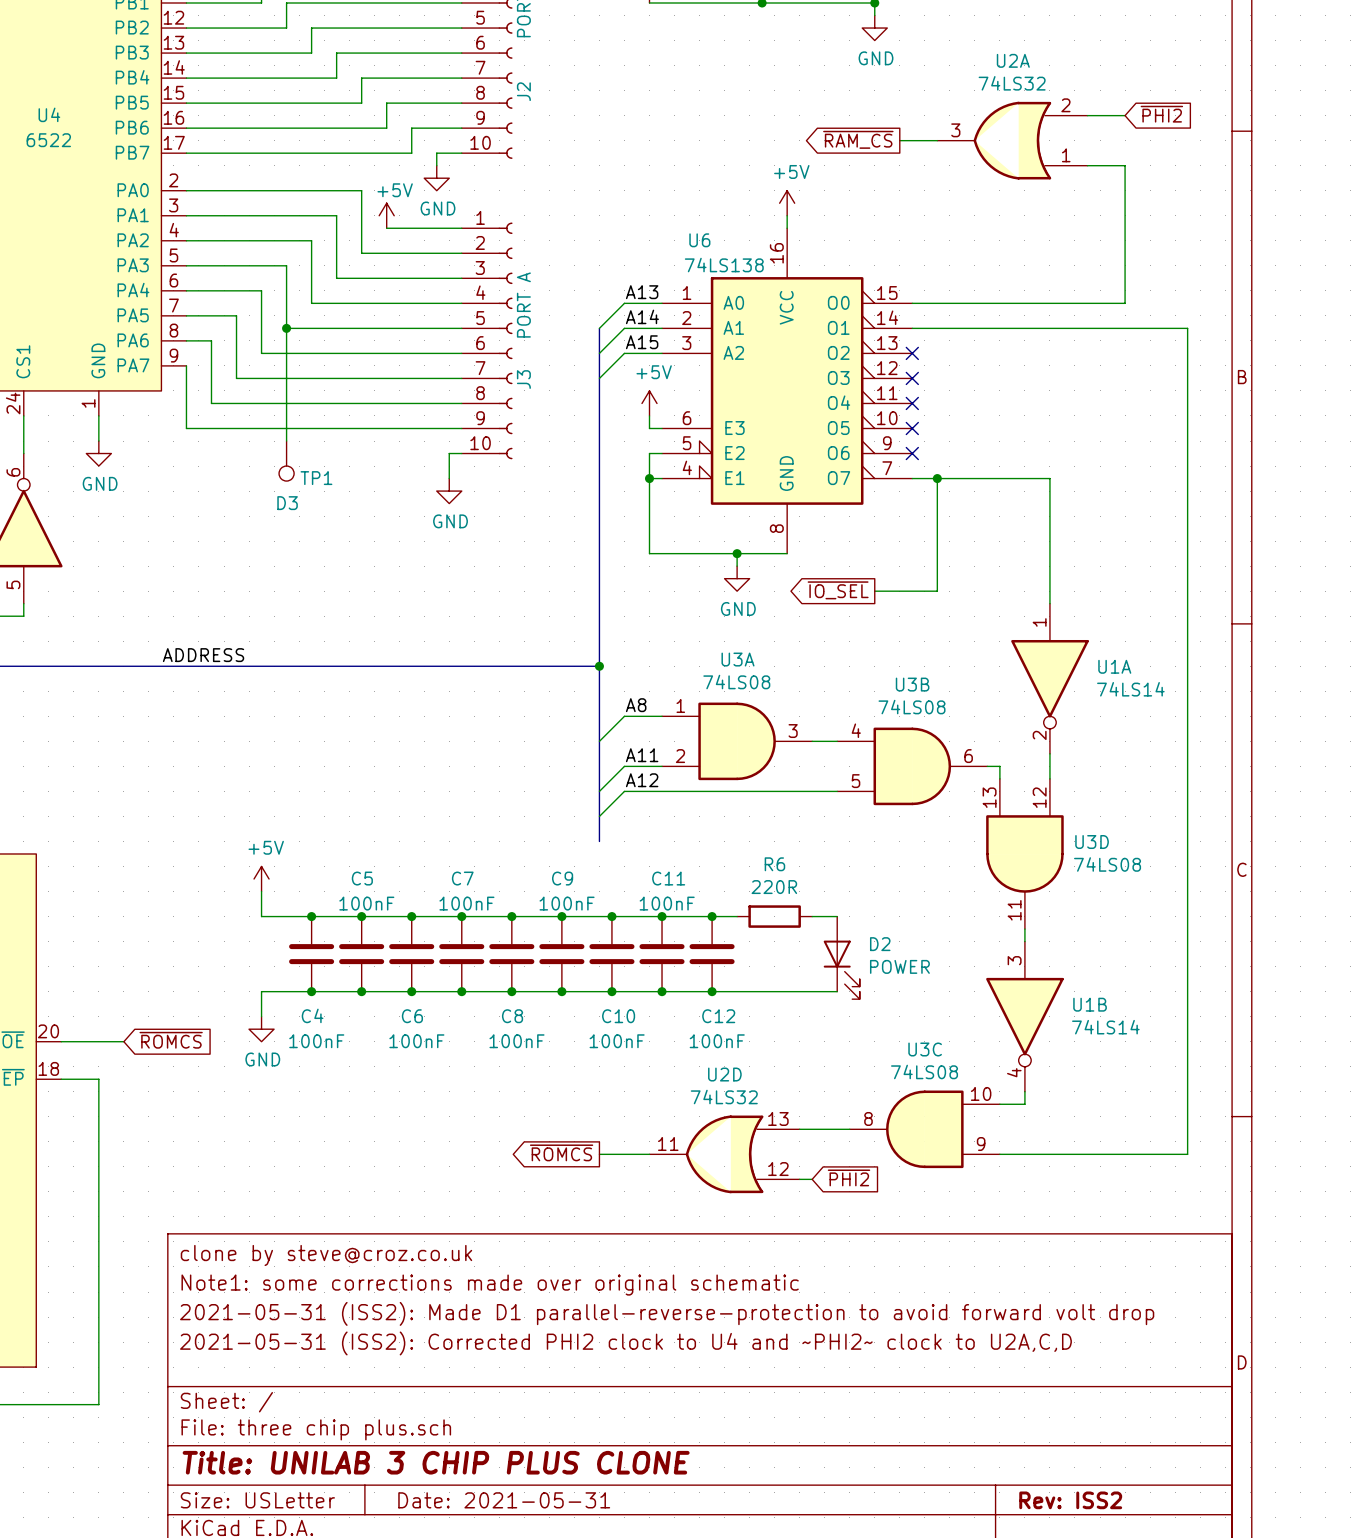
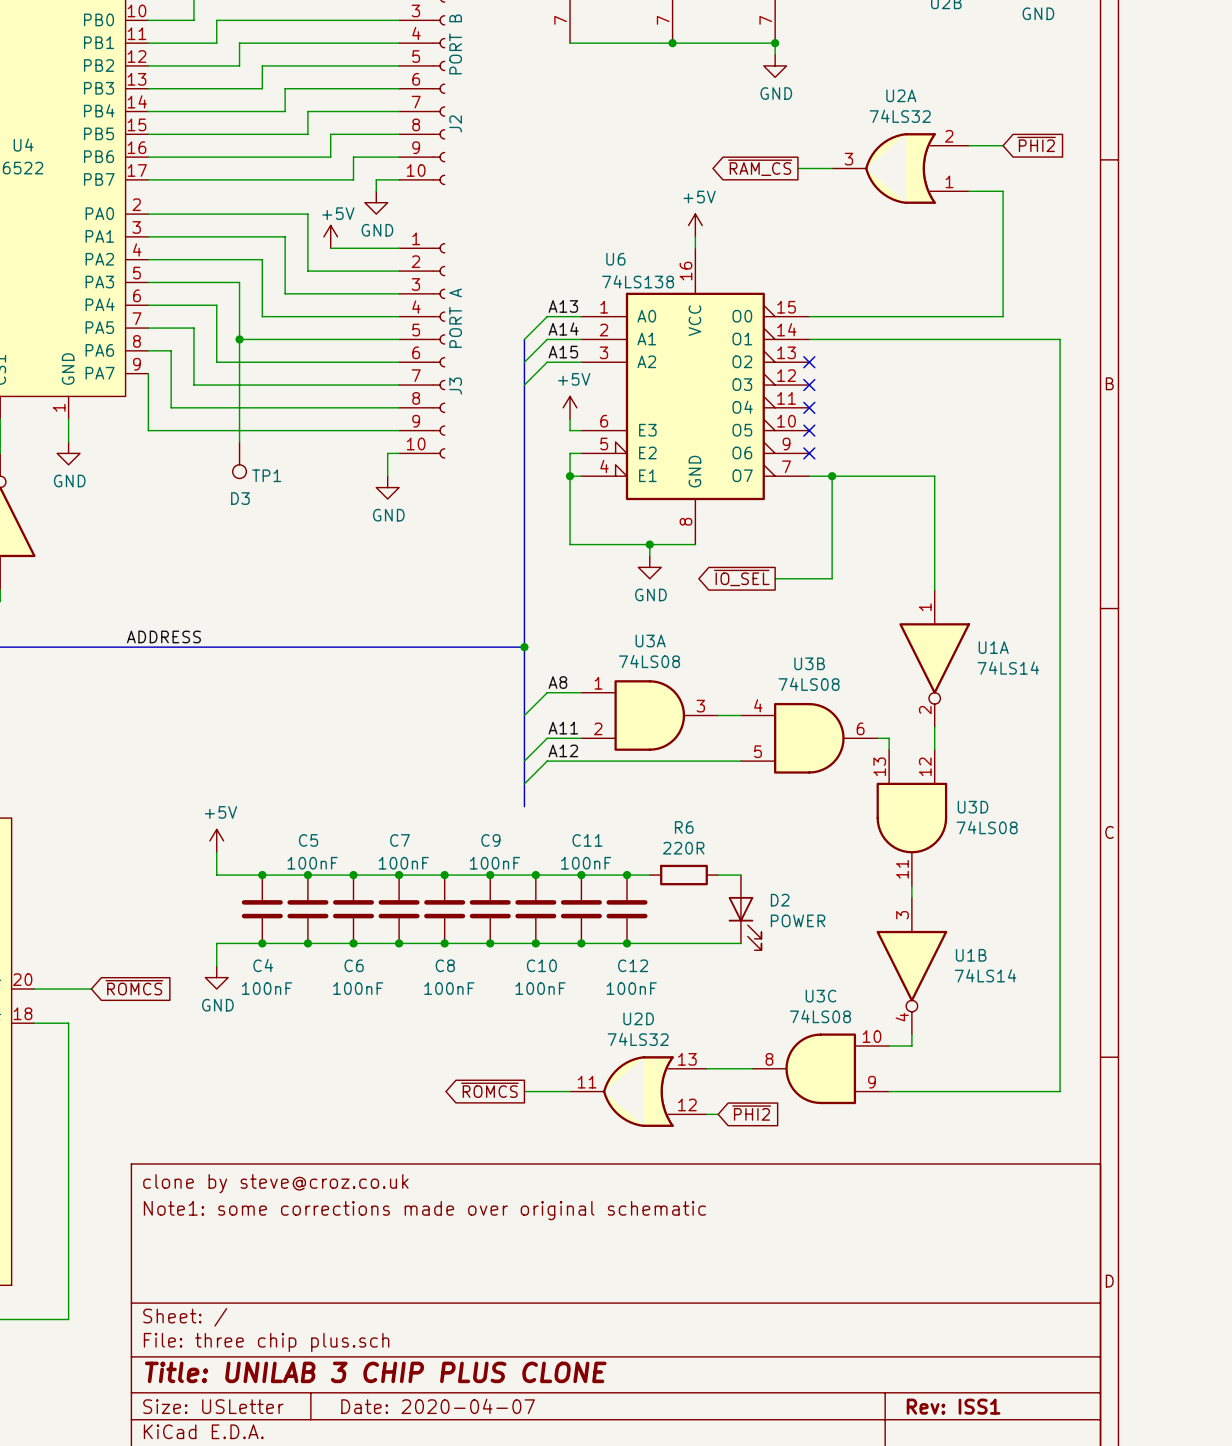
title block: 2021-05-31 (ISS2): Made D1 parallel-reverse-protection to avoid forward volt drop (667, 1313) -> none
title block: 2021-05-31 (ISS2): Corrected PHI2 clock to U4 and ~PHI2~ clock to U2A,C,D (625, 1343) -> none
title block: Date: 2021-05-31 (504, 1500) -> Date: 2020-04-07 (438, 1406)
title block: Rev: ISS2 (1070, 1500) -> Rev: ISS1 (953, 1406)

